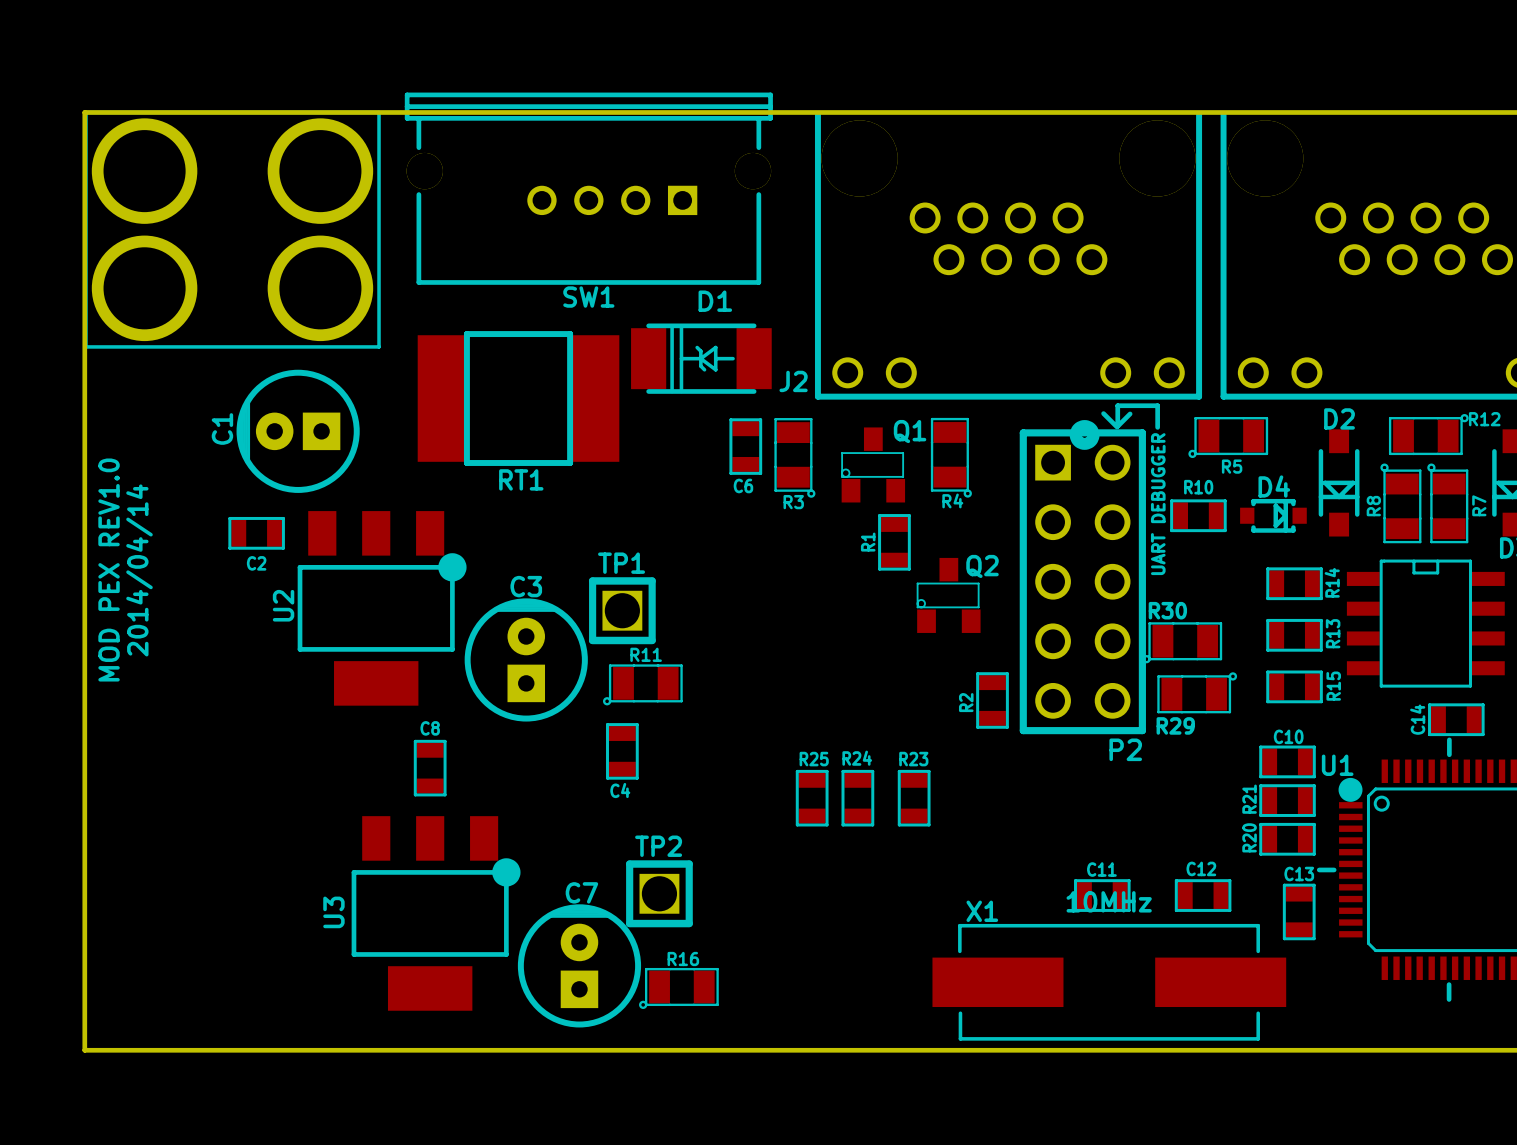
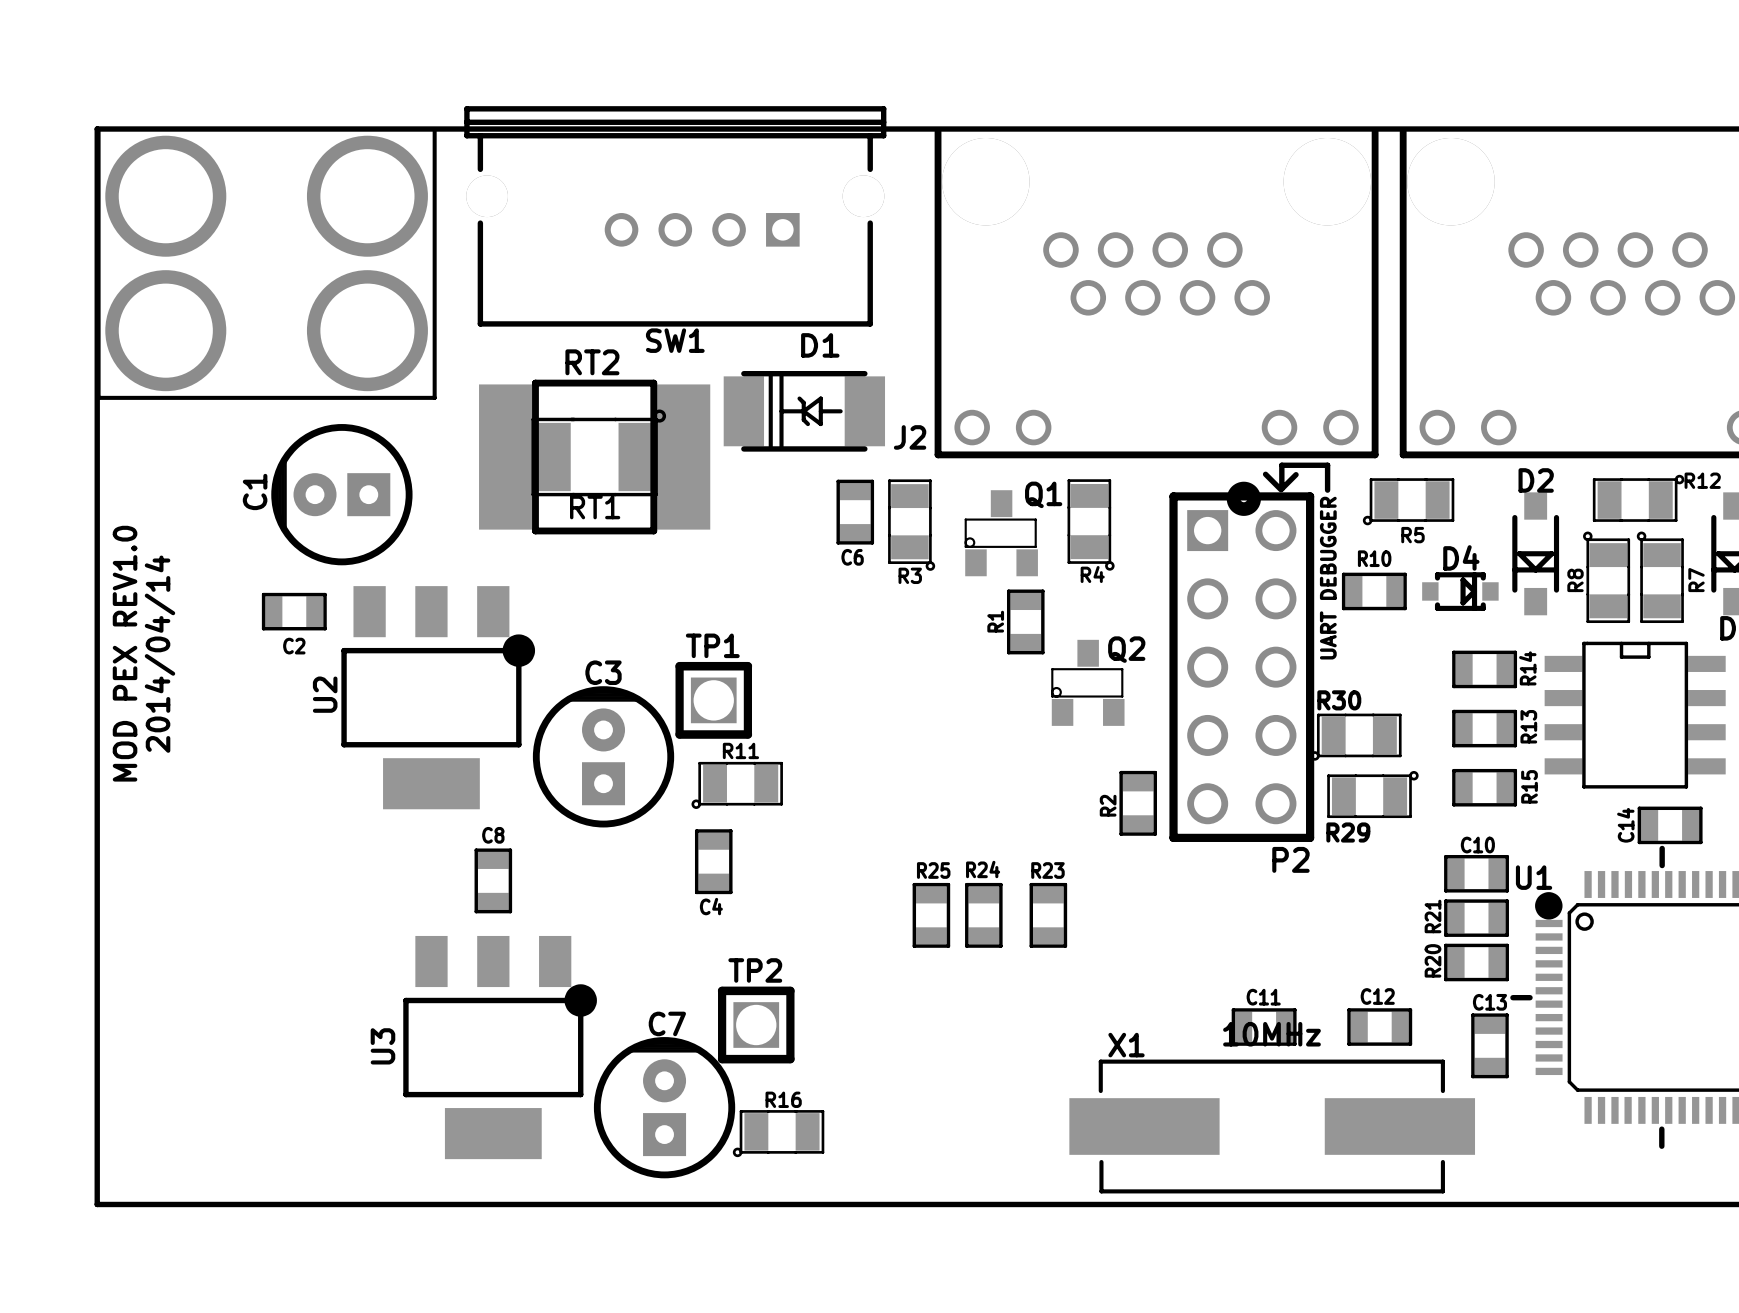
RT1: none -> (598, 452)
RT1 name: RT1 (521, 479) -> RT2 (592, 362)

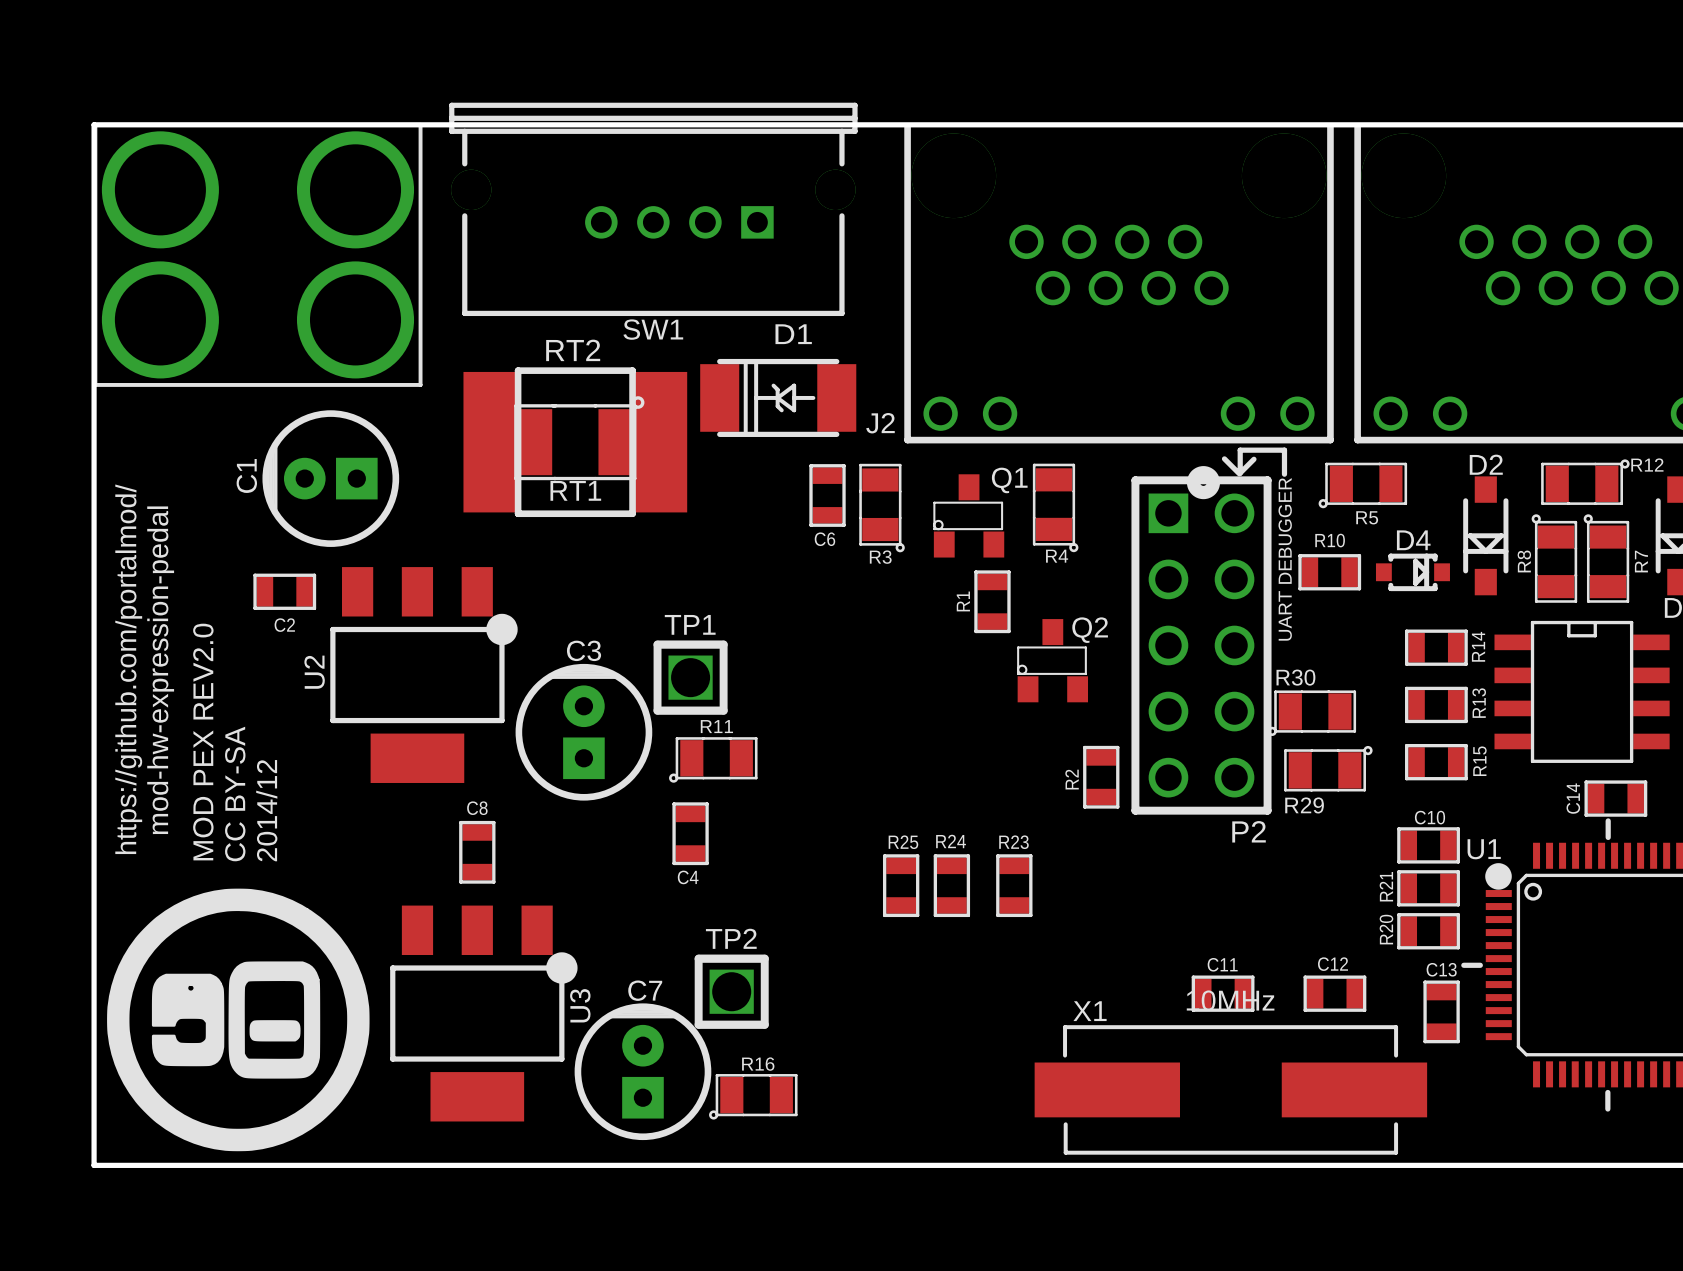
text: MOD PEX REV1.0 (125, 653) -> none
text: 2014/04/14 (159, 654) -> none
text: none -> https://github.com/portalmod/ (128, 669)
text: none -> mod-hw-expression-pedal (160, 670)
text: none -> MOD PEX REV2.0 (203, 742)
text: none -> CC BY-SA (235, 794)
text: none -> 2014/12 (266, 810)
drawing: none -> [107, 888, 370, 1152]
U3 name position: U3 (382, 1046) -> U3 (580, 1005)

